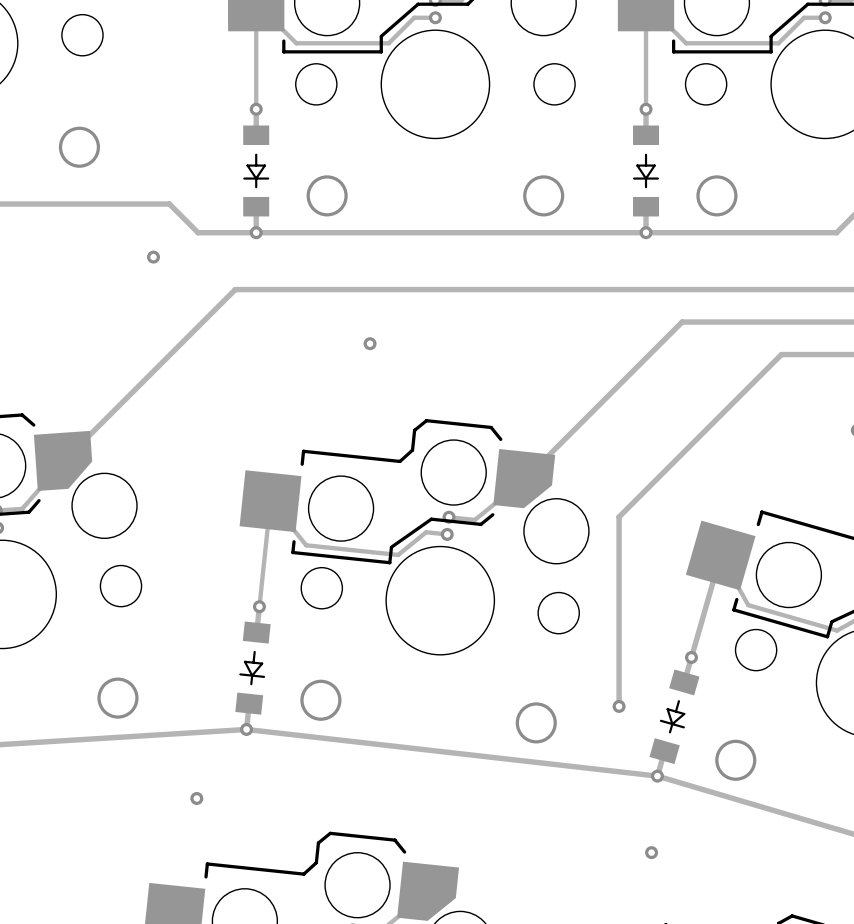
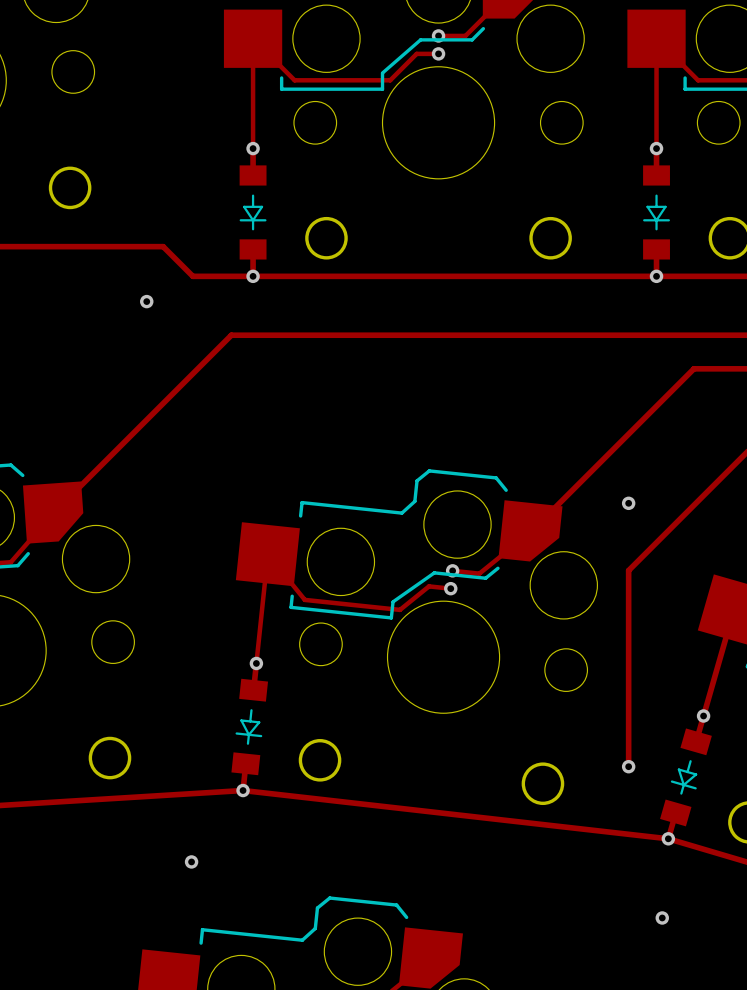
via: (370, 343) -> none
via: none -> (628, 503)

